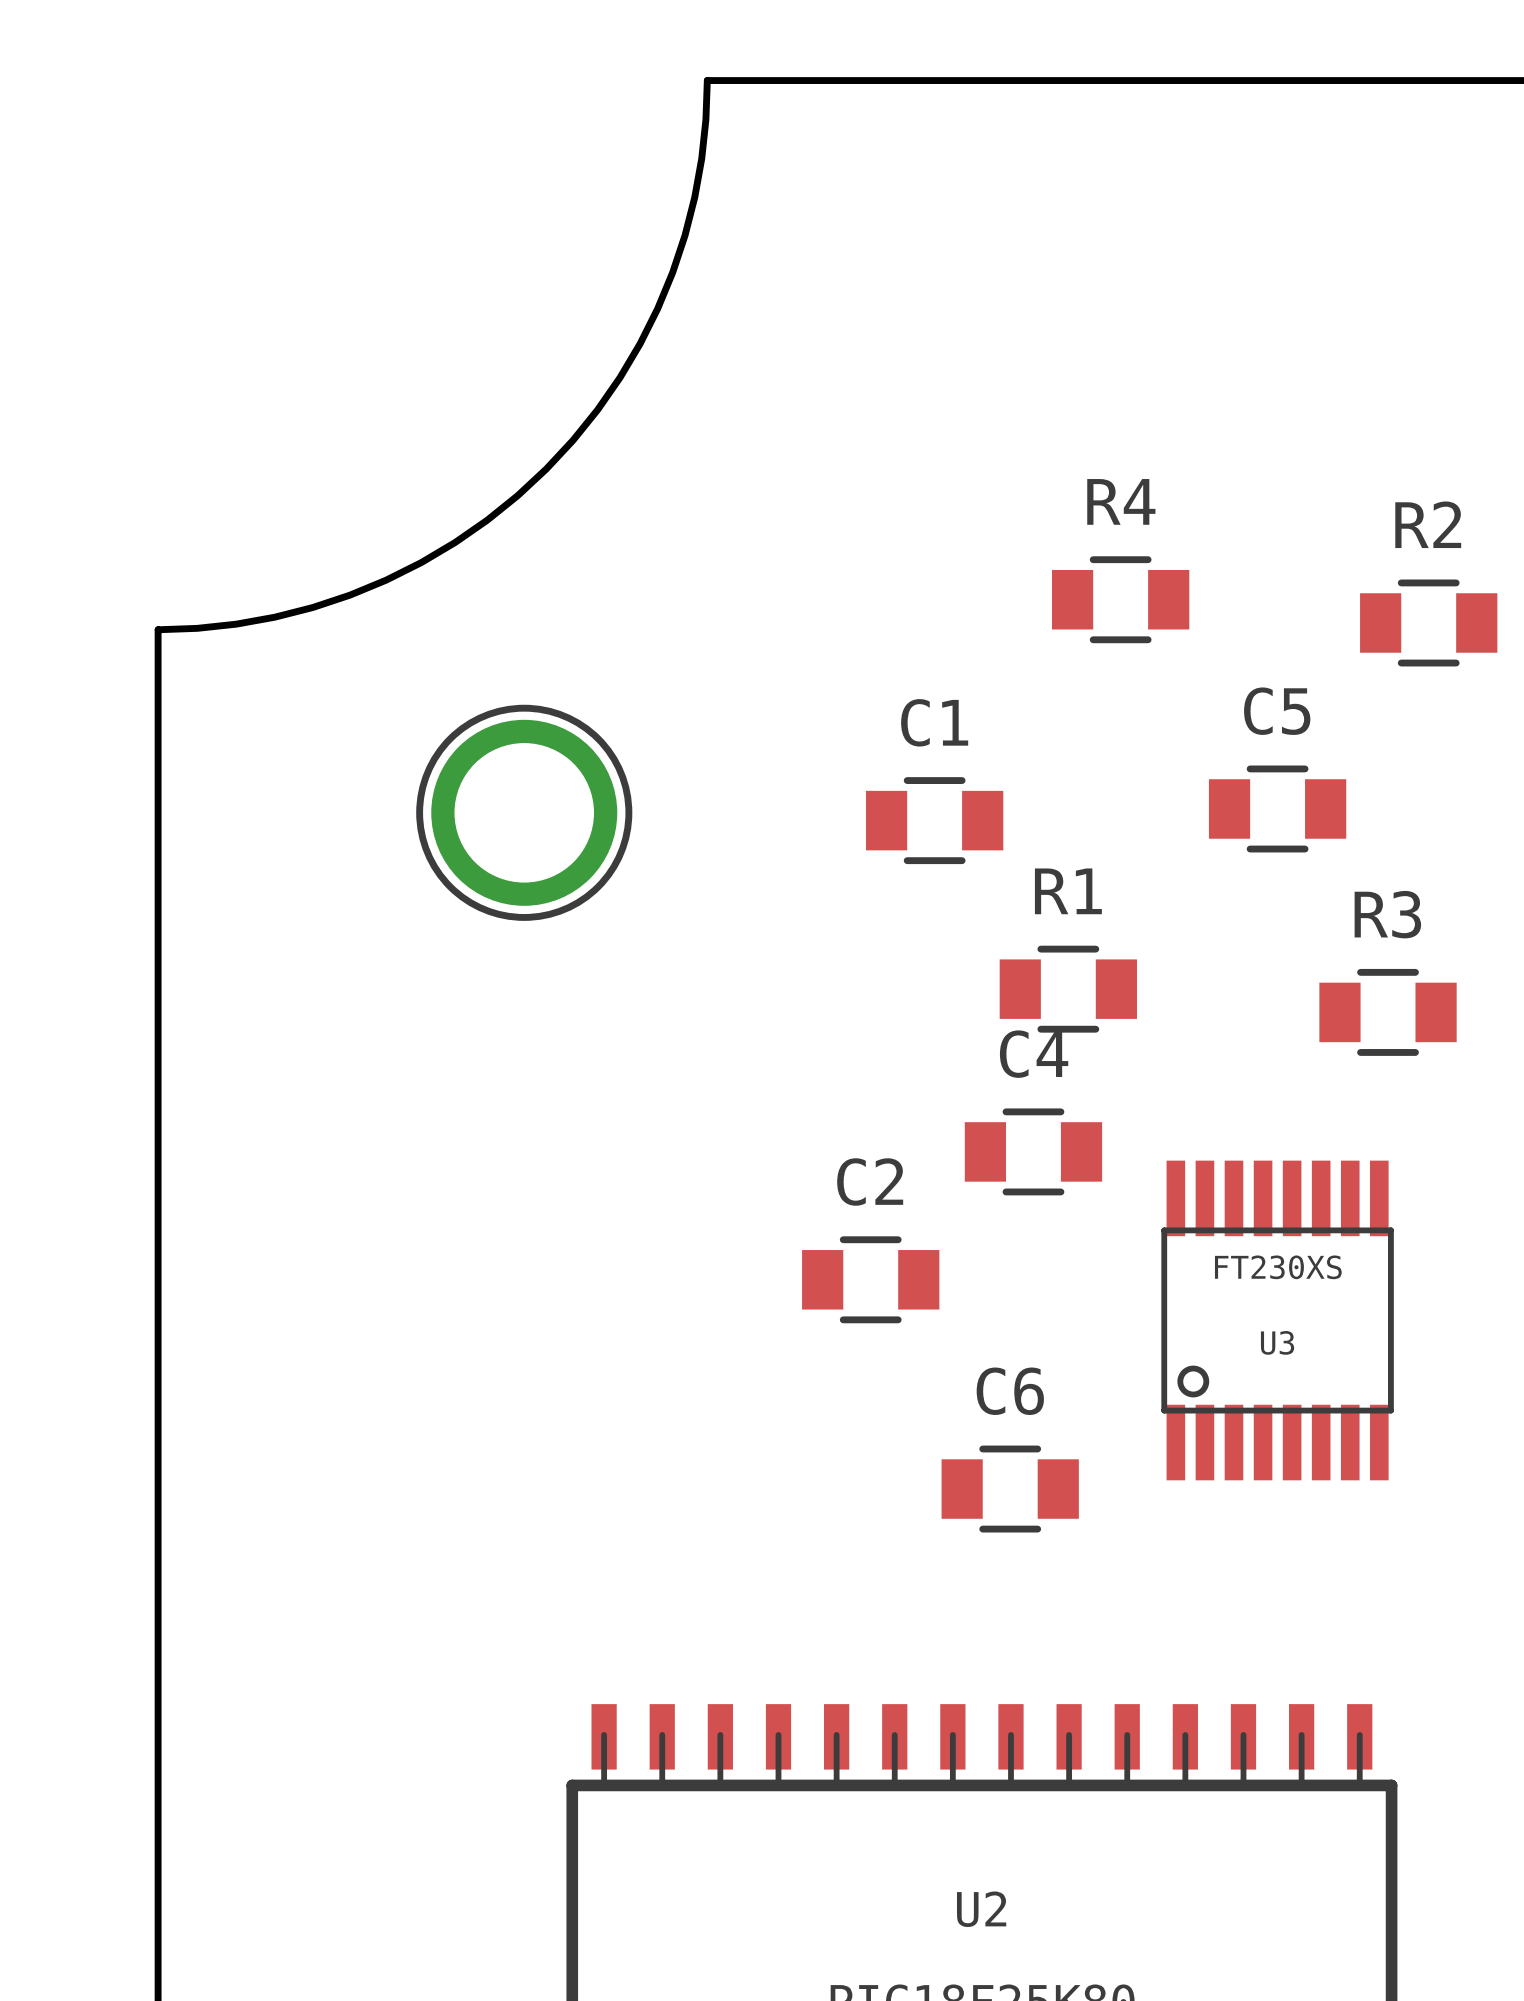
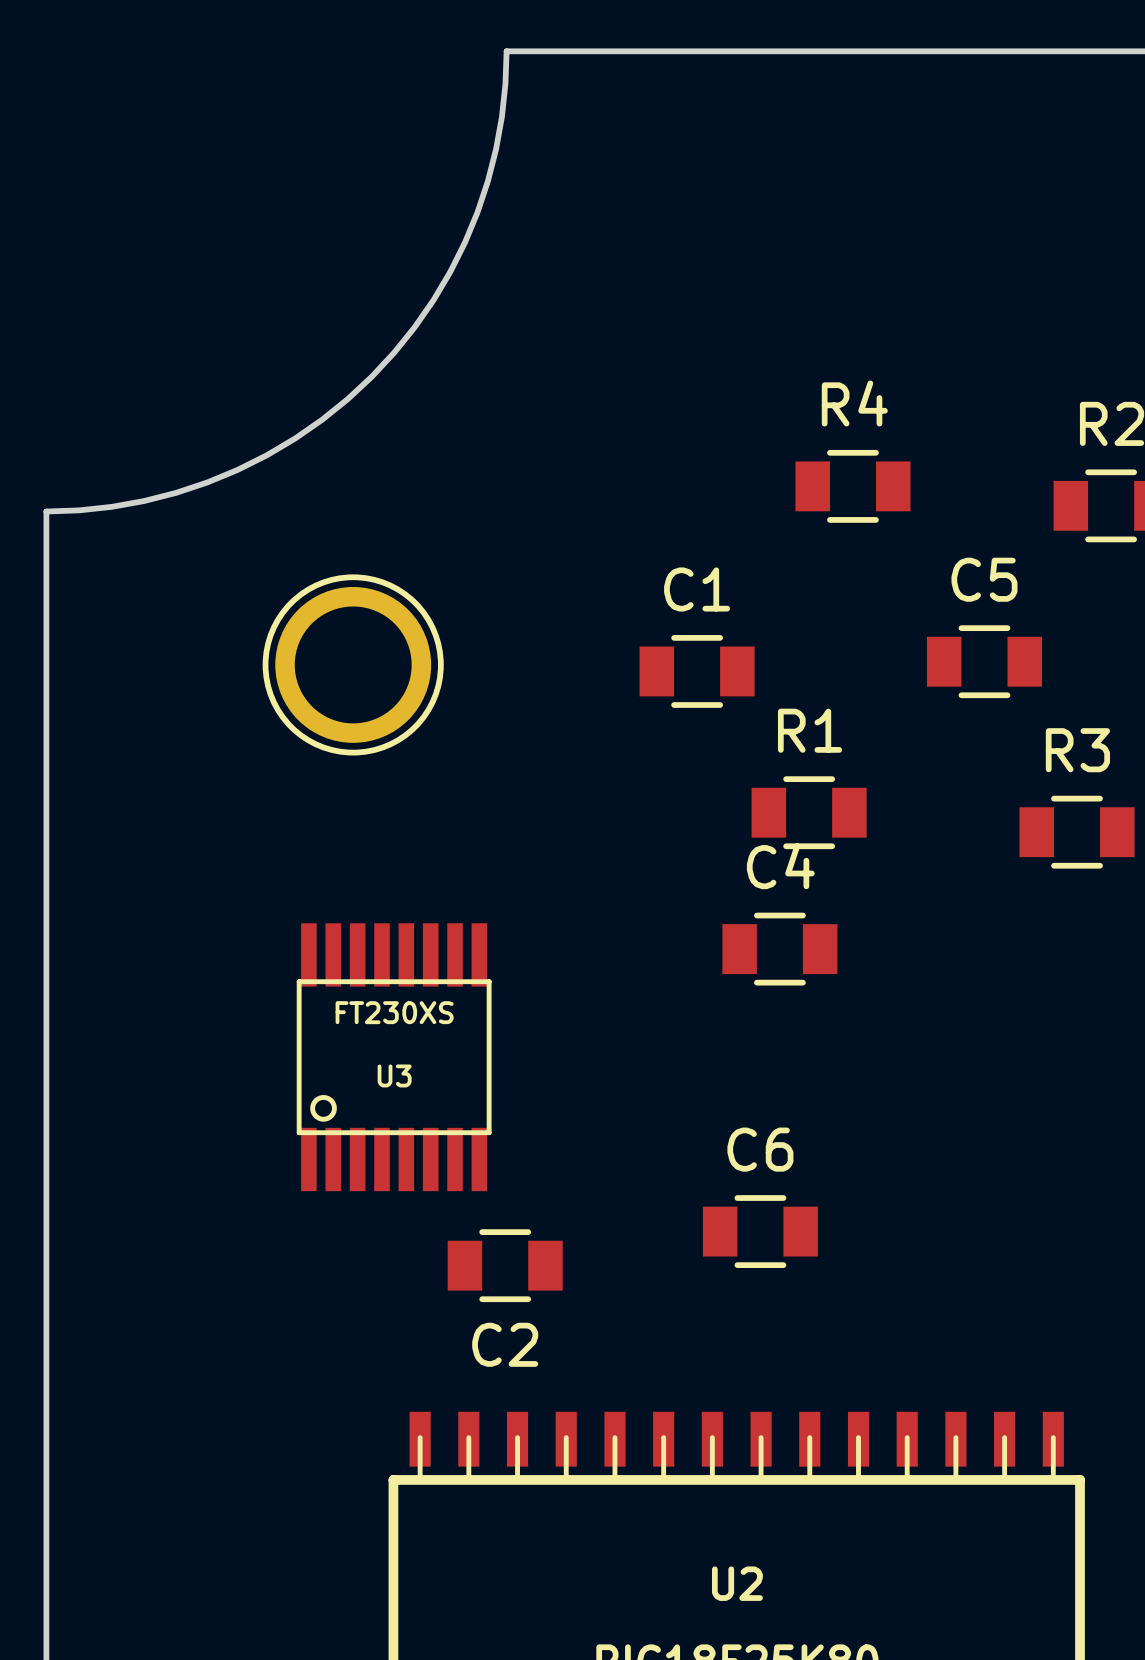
C2 name position: C2 (870, 1182) -> C2 (505, 1344)
C2 position: (870, 1279) -> (505, 1265)
U3 position: (1277, 1320) -> (394, 1057)

